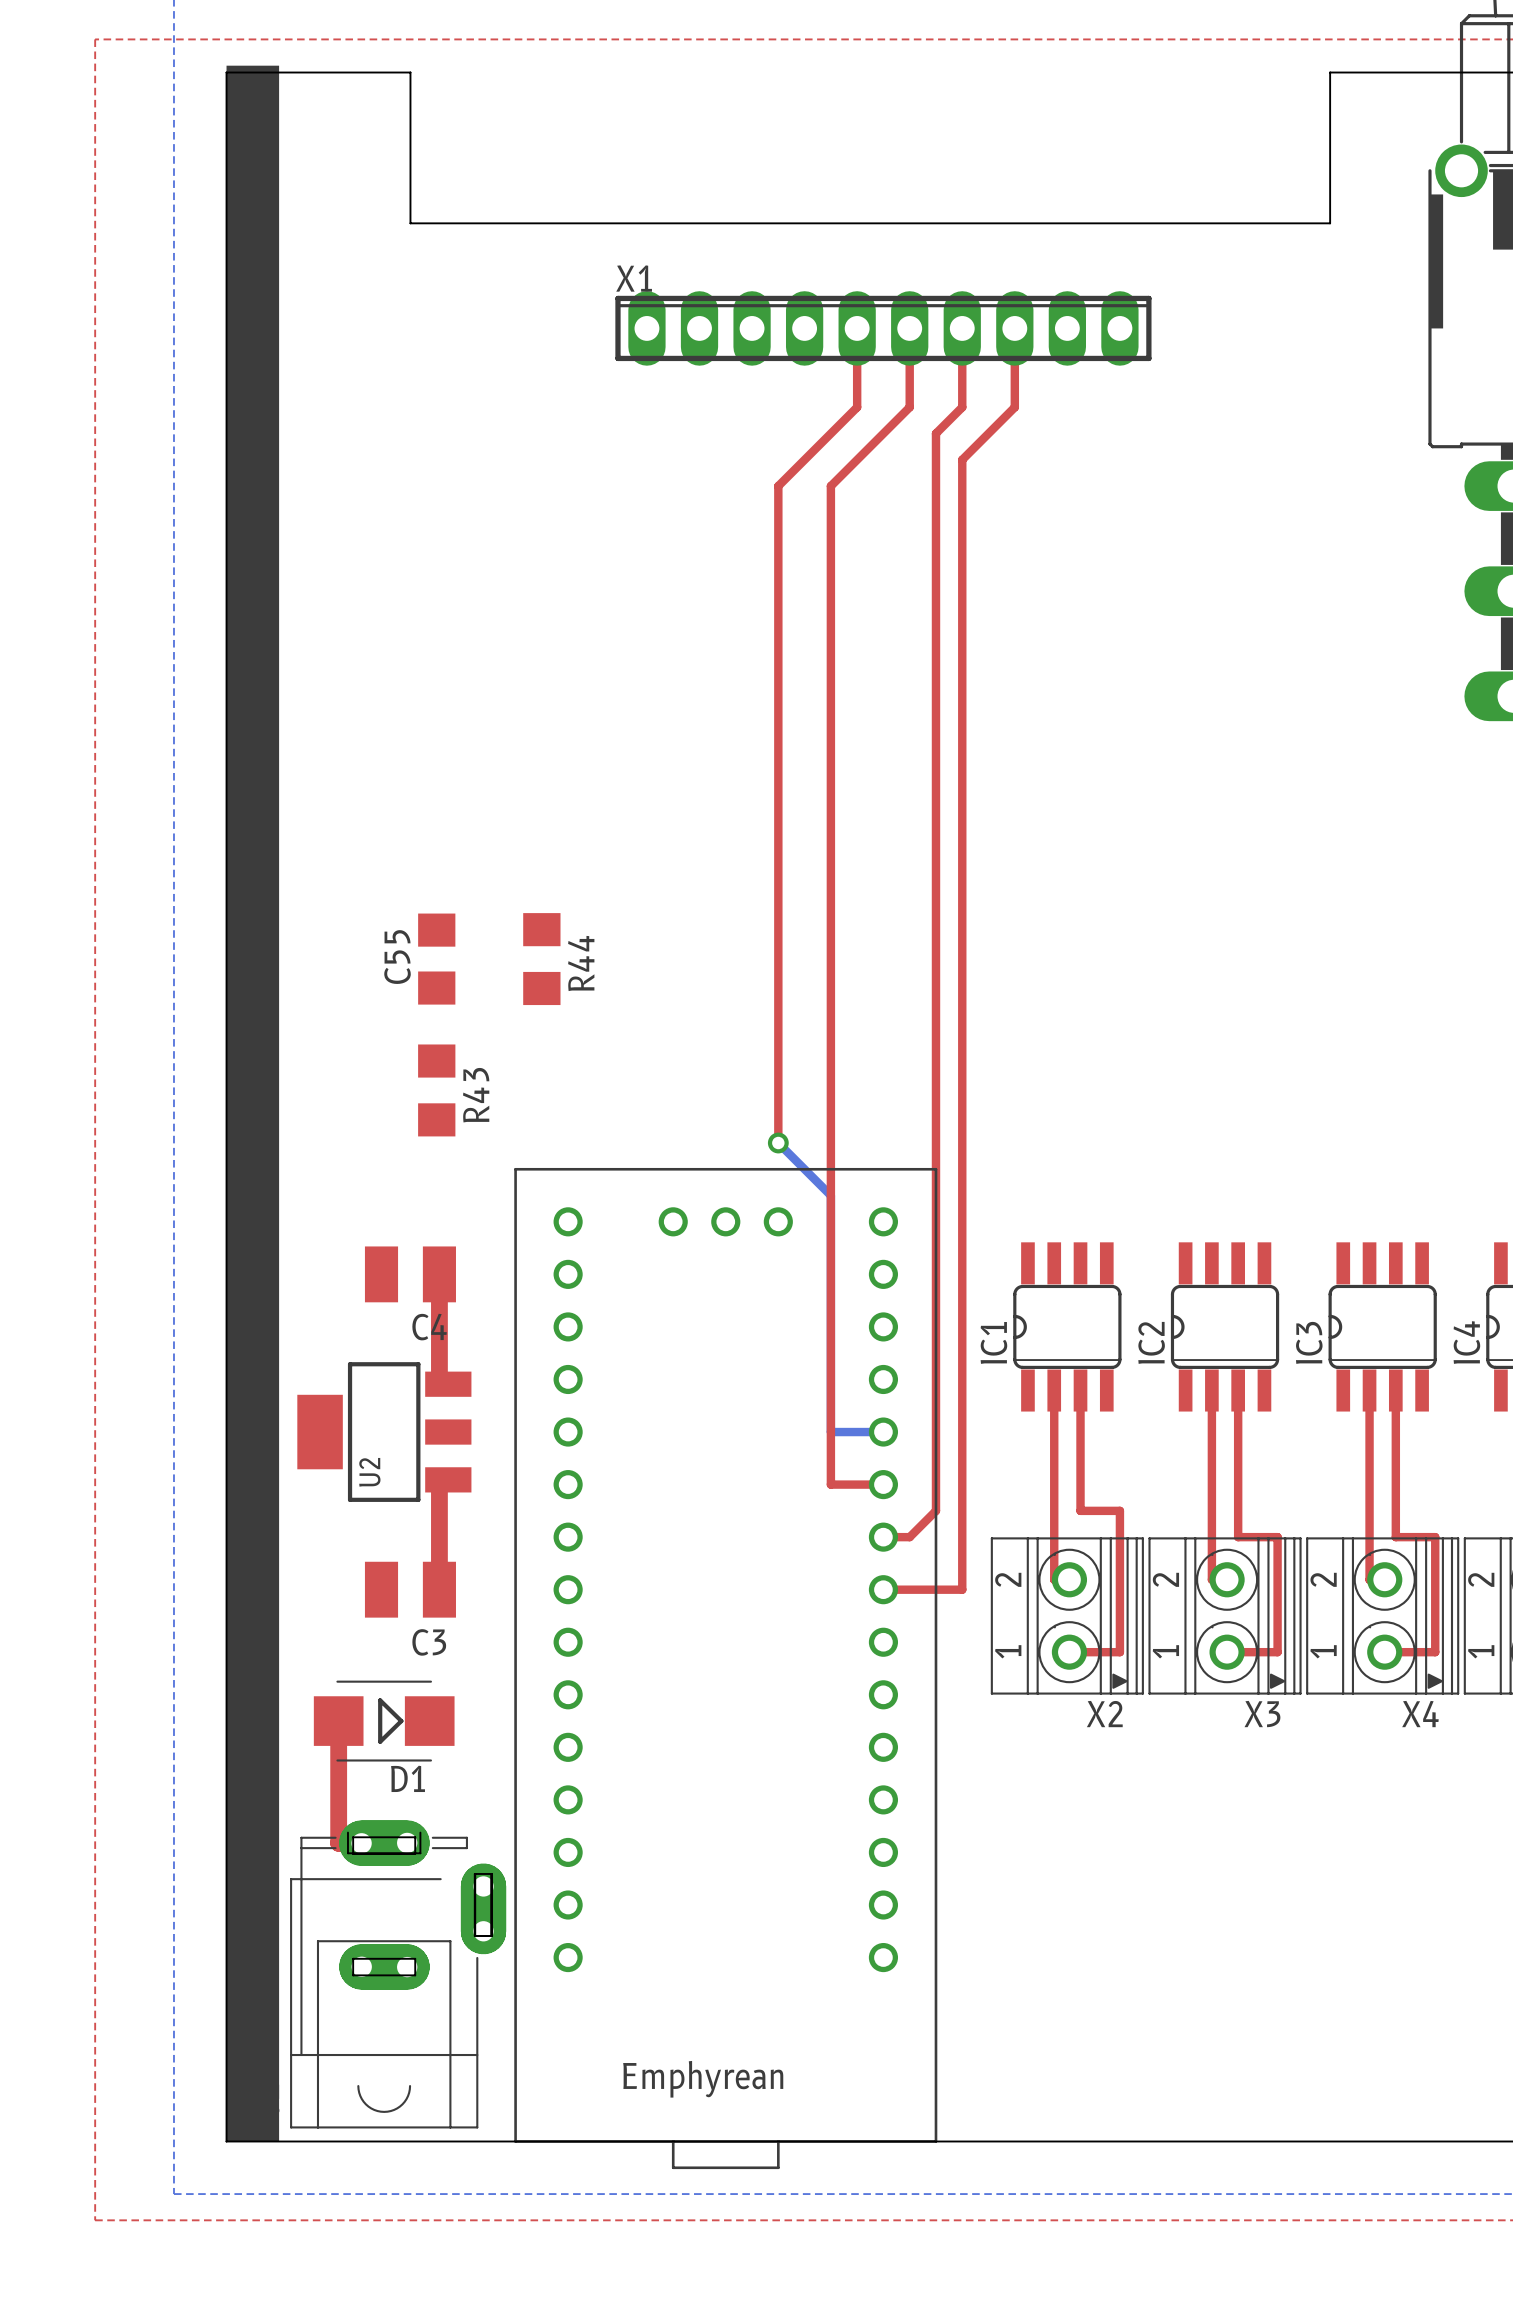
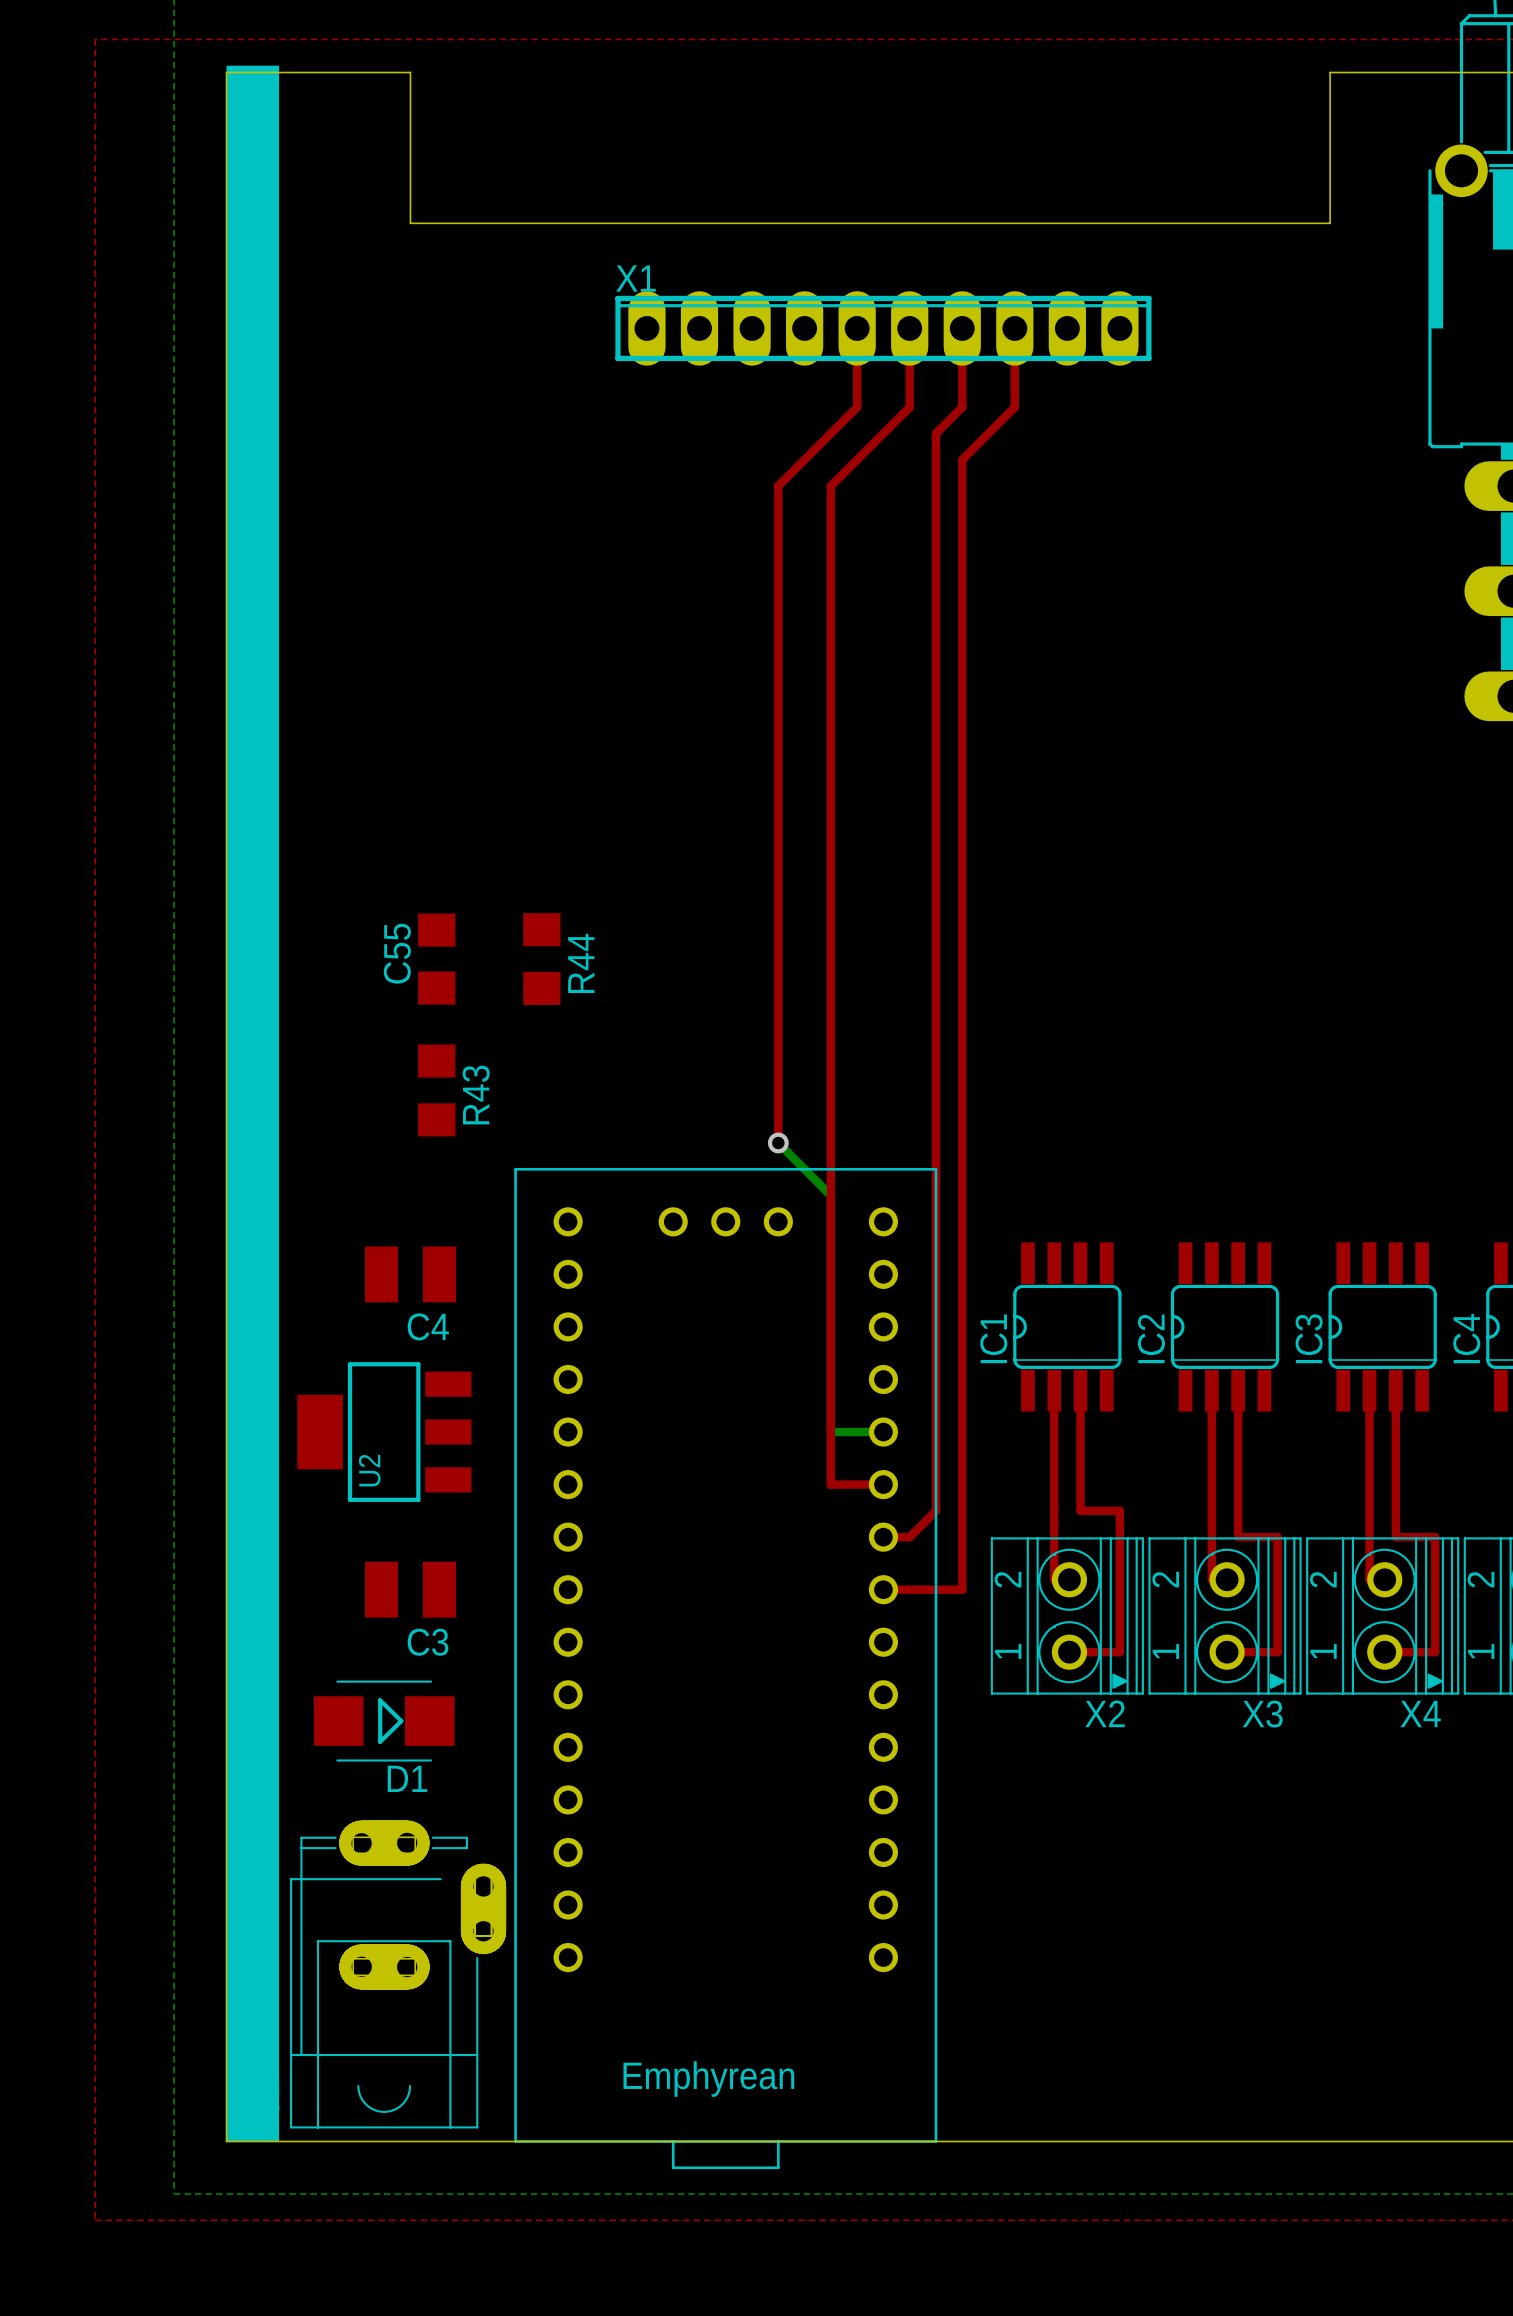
top track: (439, 1274) (439, 1384) (448, 1384) -> none
top track: (448, 1479) (439, 1479) (439, 1589) -> none
top track: (338, 1721) (338, 1843) (361, 1843) -> none

